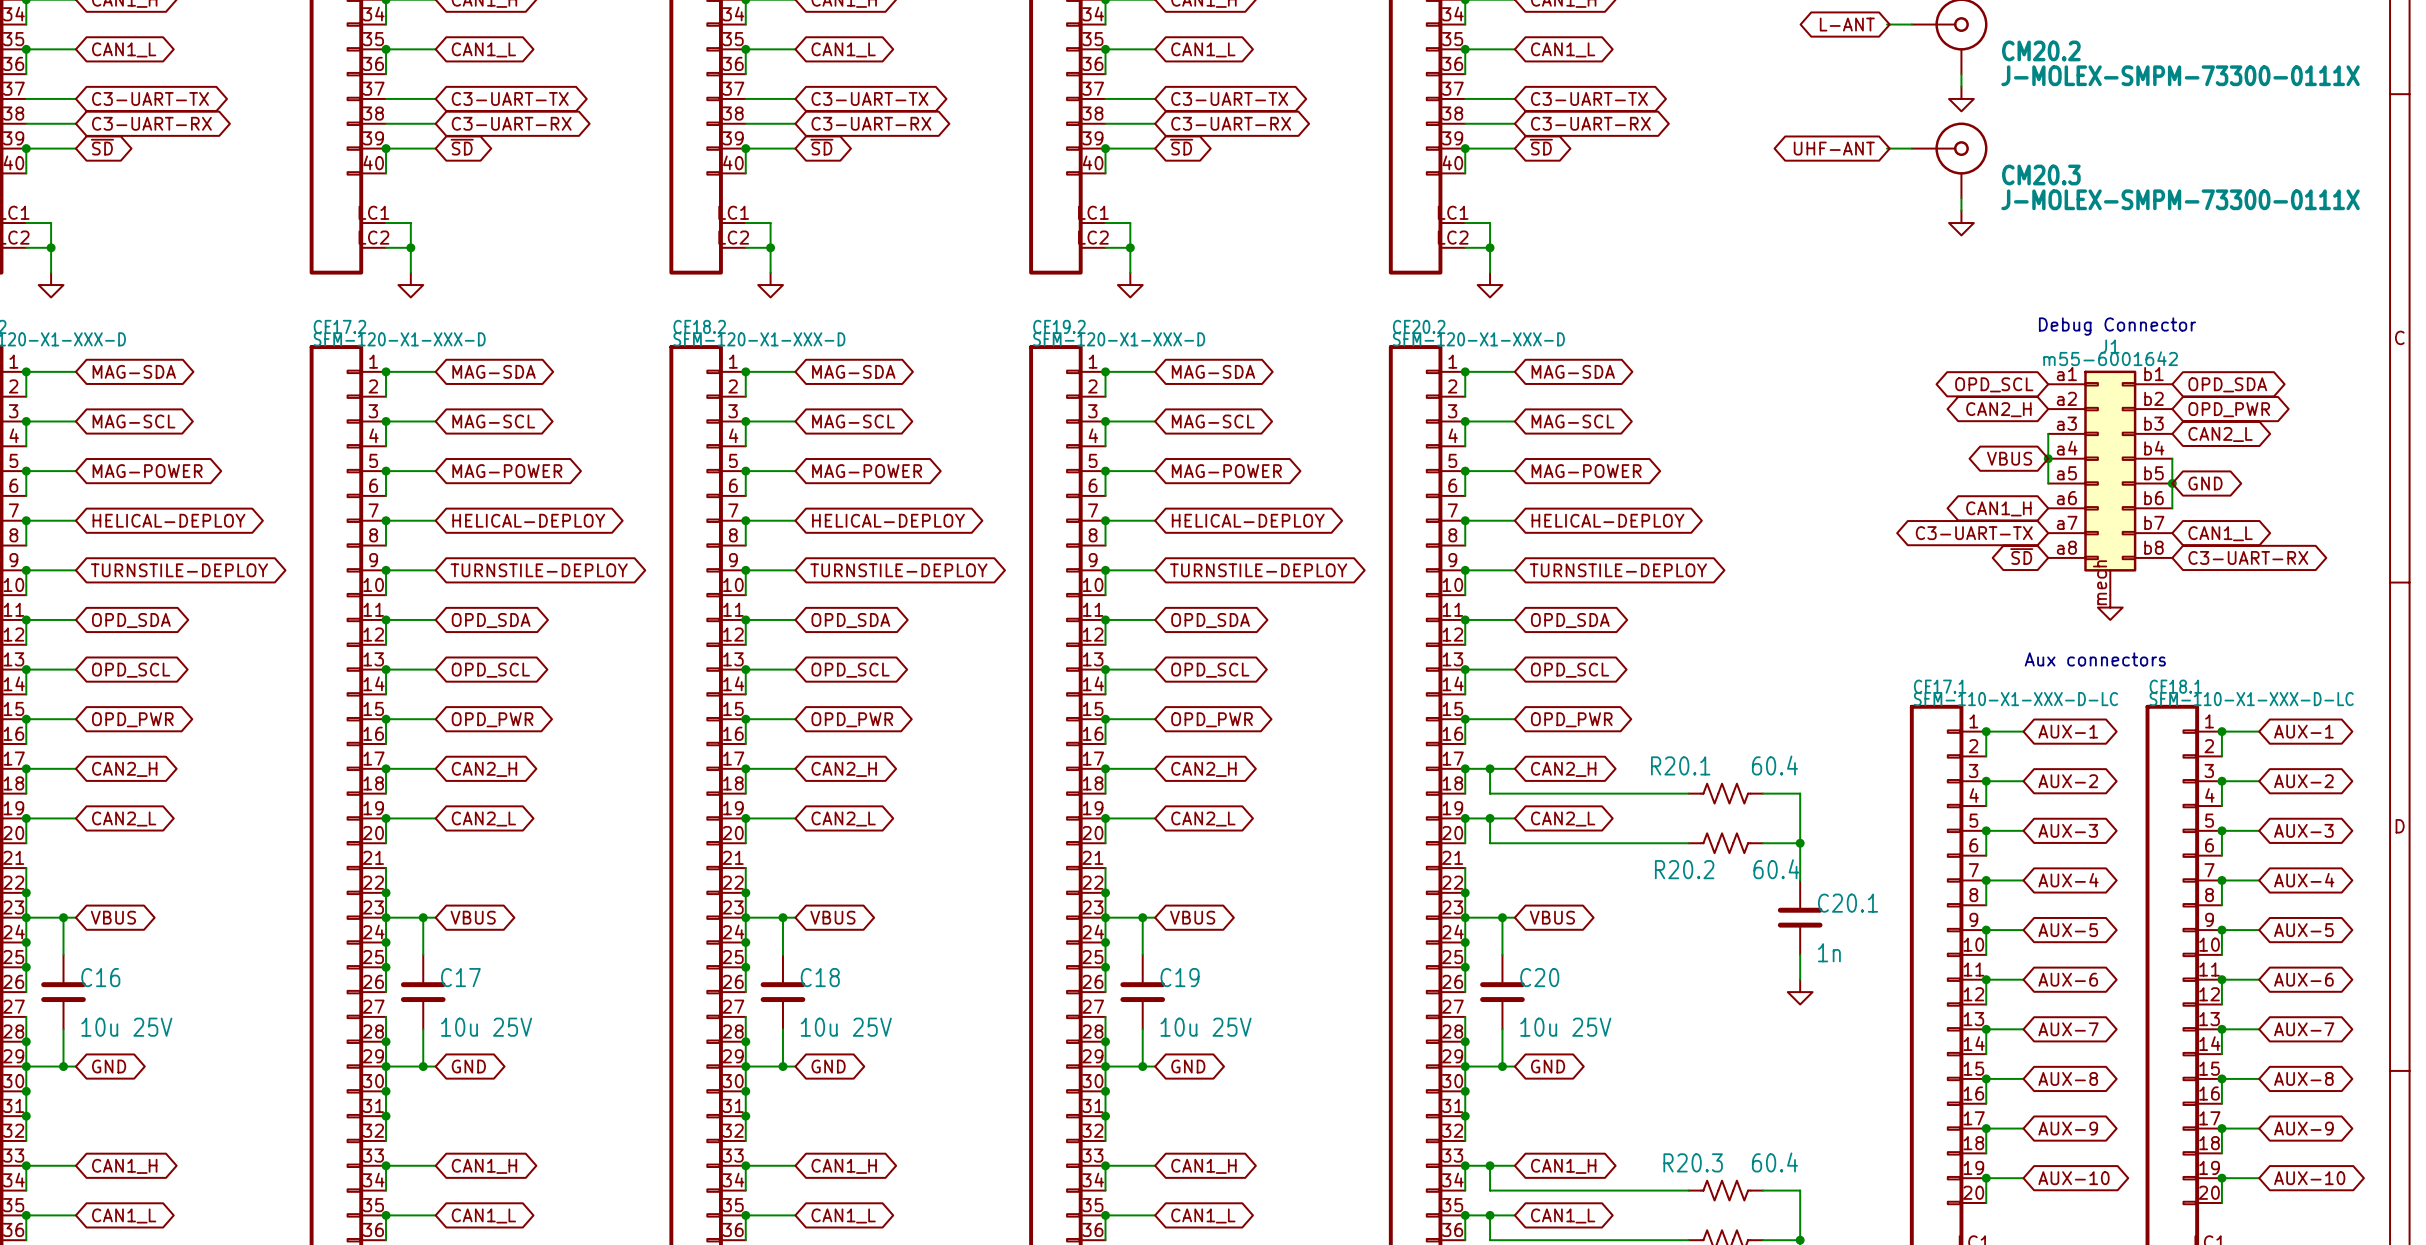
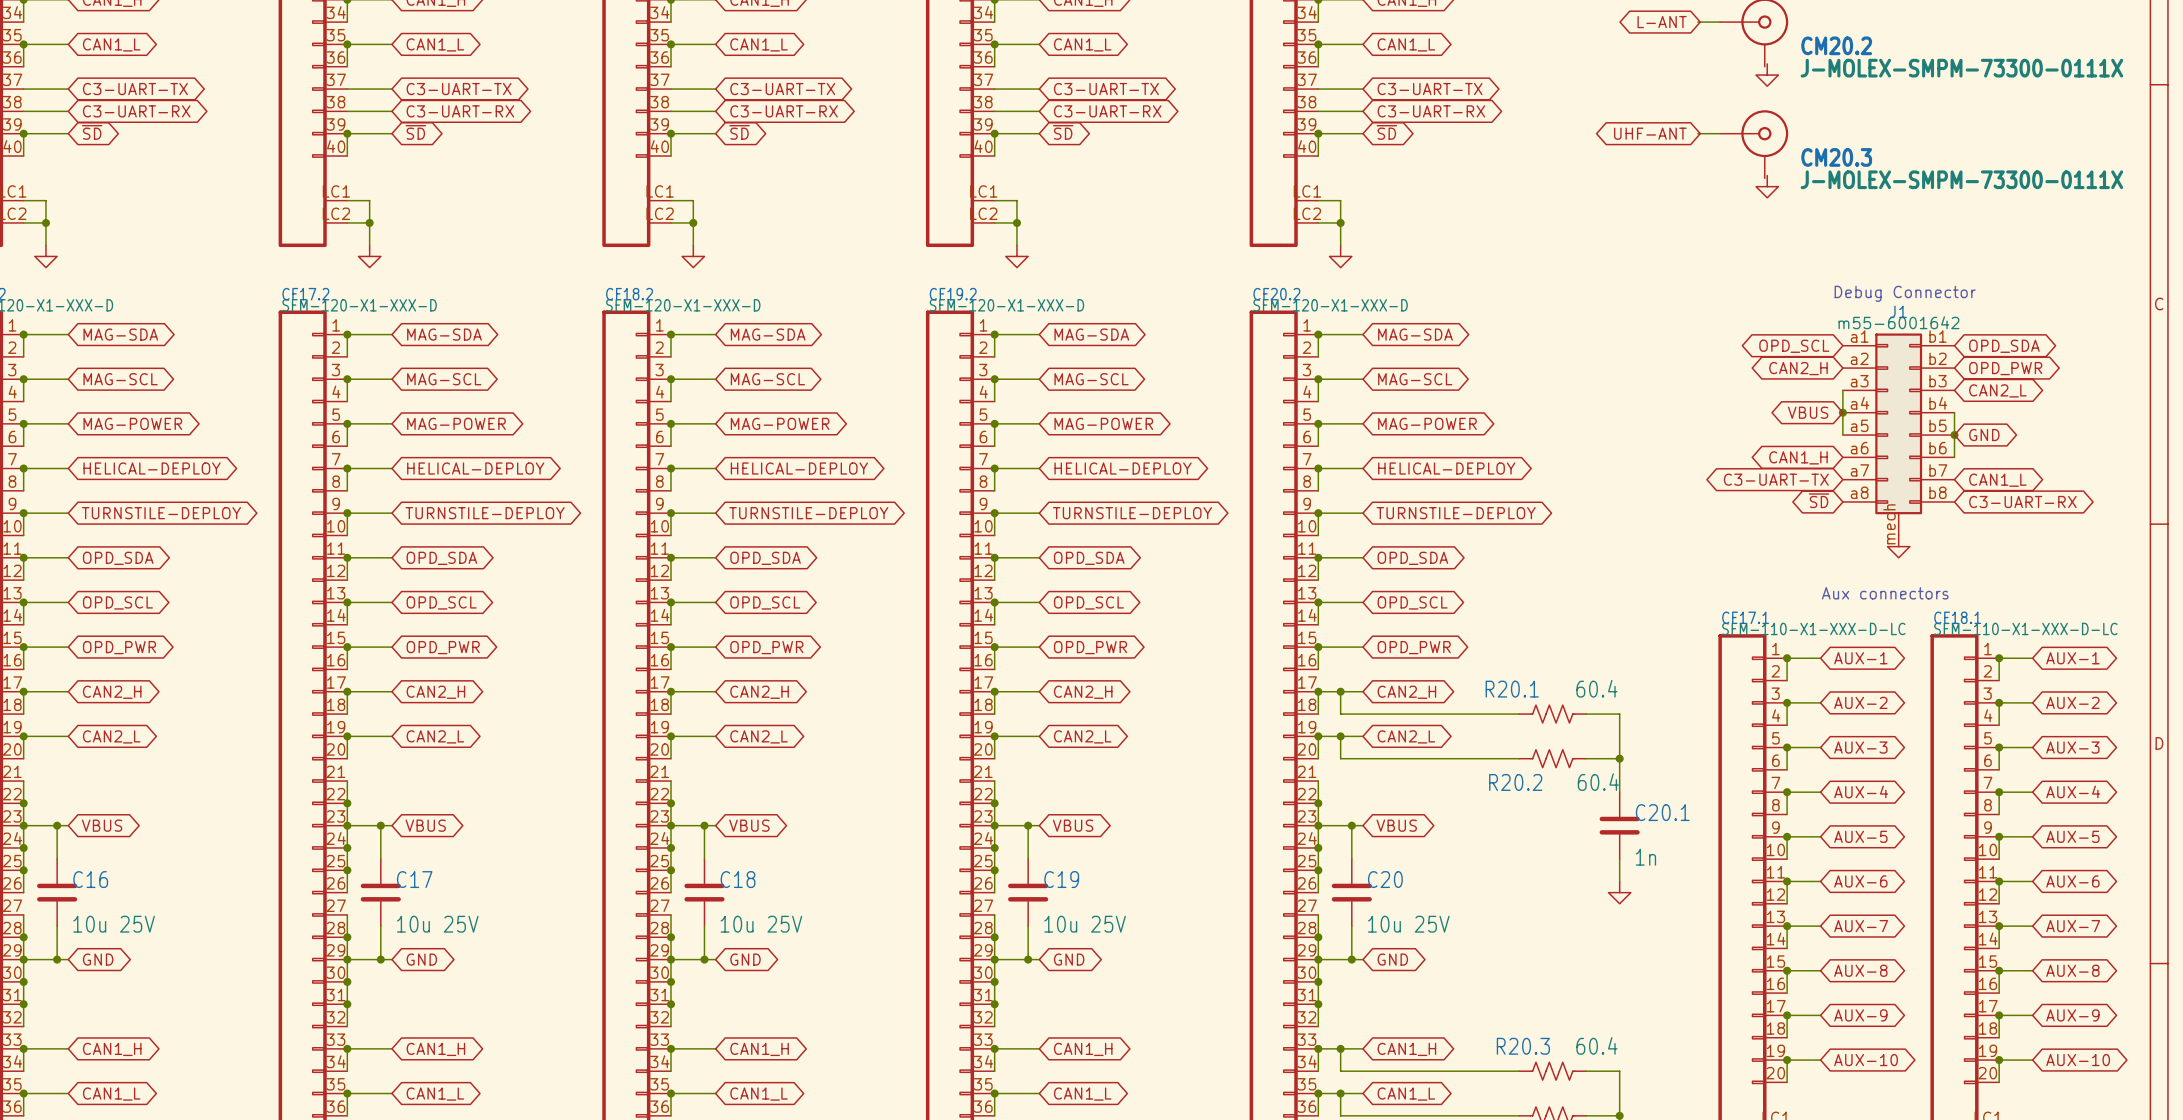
wire: (1961, 74) (1961, 86) -> none
power symbol position: (1961, 98) -> (1767, 75)
wire: (1961, 198) (1961, 210) -> none
power symbol position: (1961, 223) -> (1767, 186)

